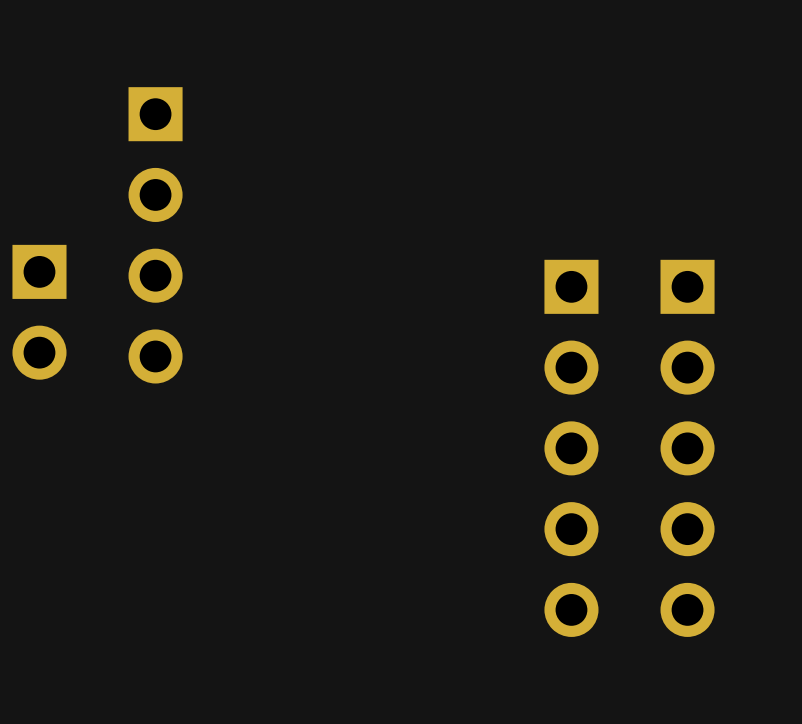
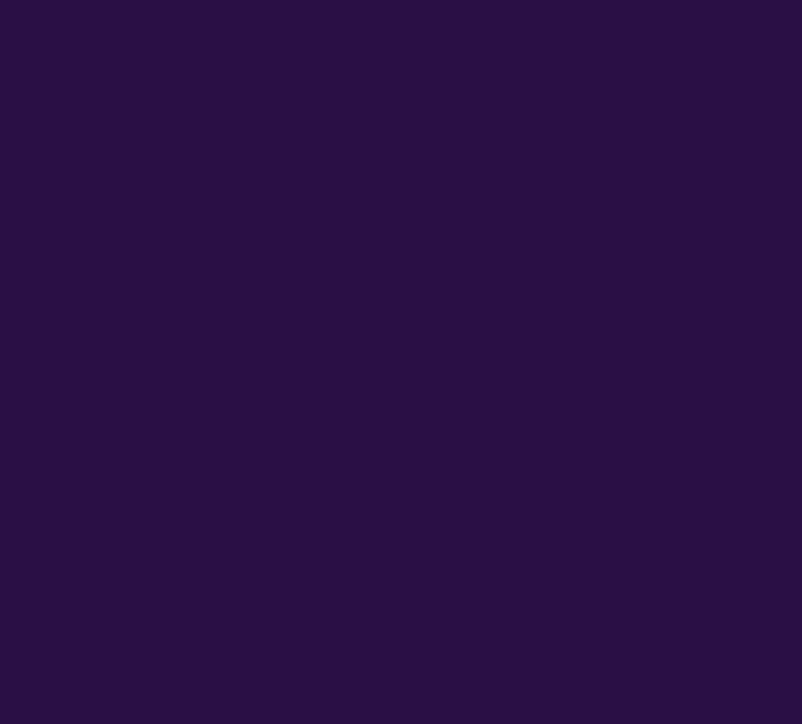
part: (155, 235) -> none
part: (39, 312) -> none
part: (571, 448) -> none
part: (687, 448) -> none

